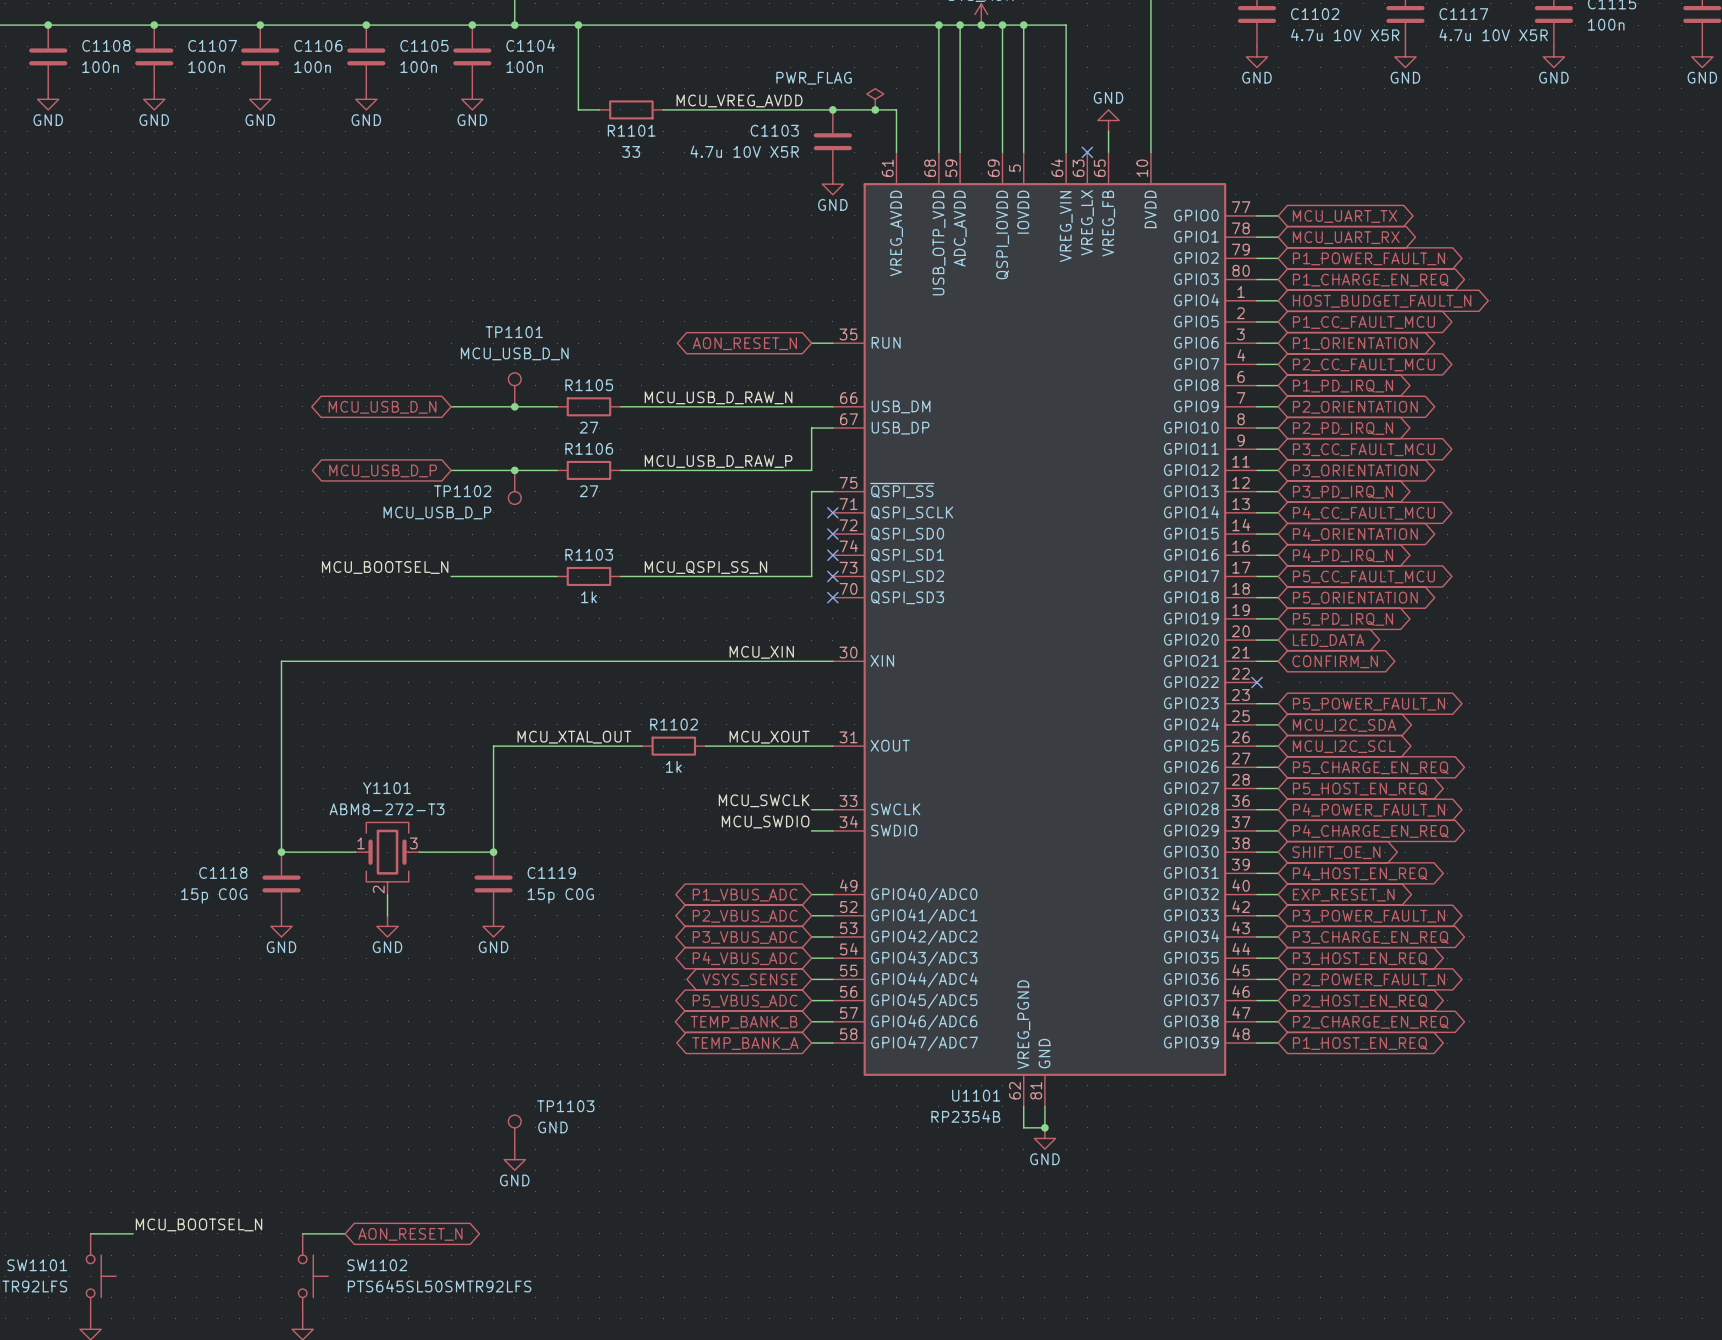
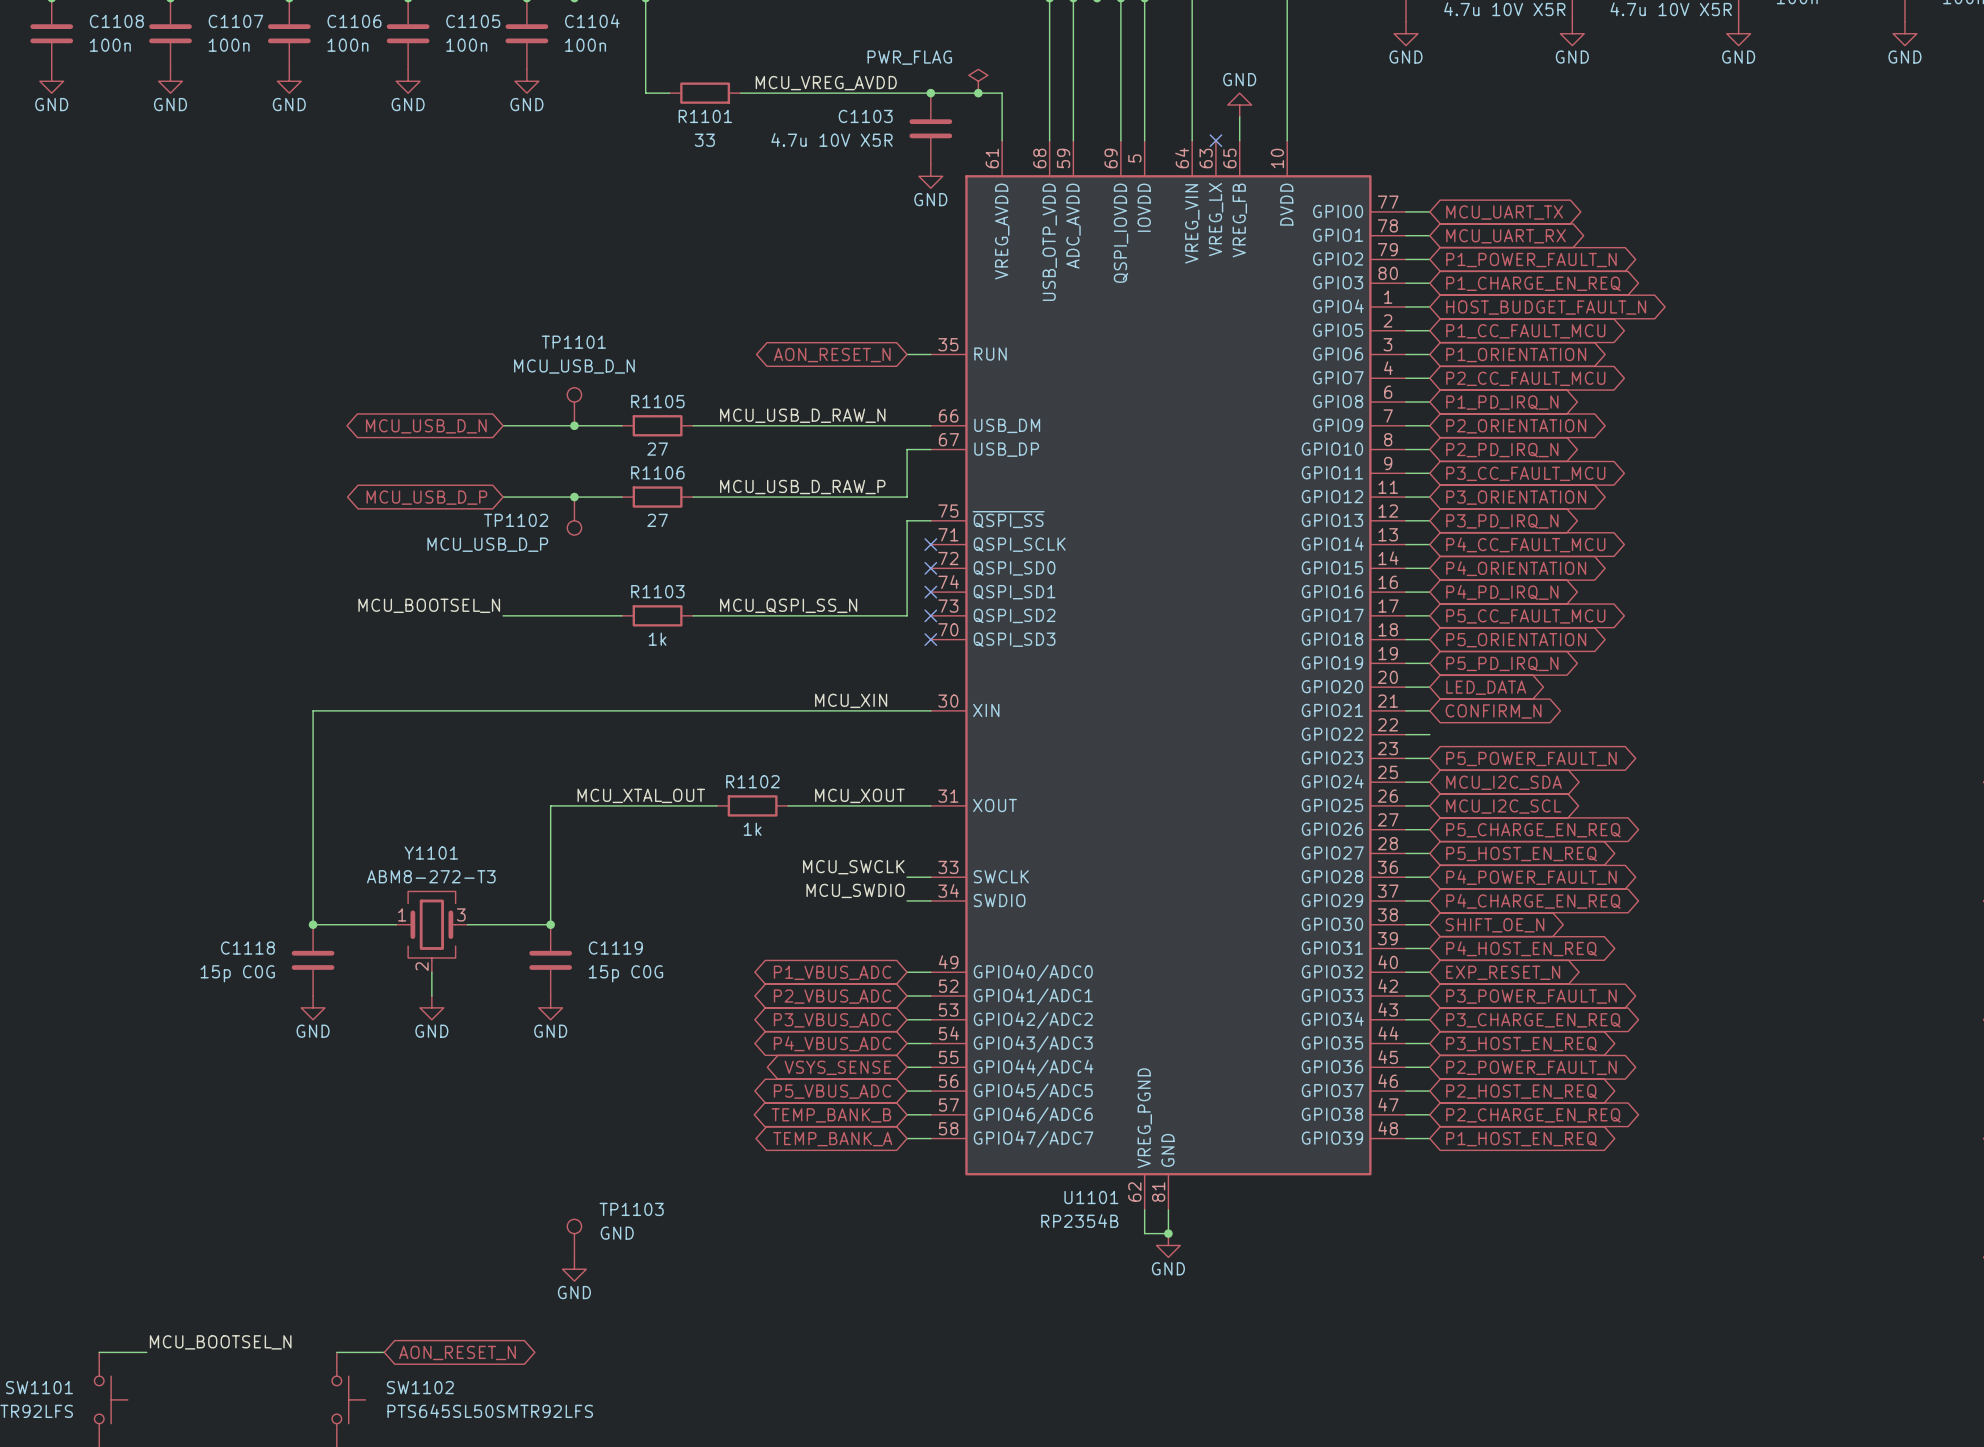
wire: none -> (1406, 734) (1429, 734)
no-connect mark: (1256, 682) -> none

